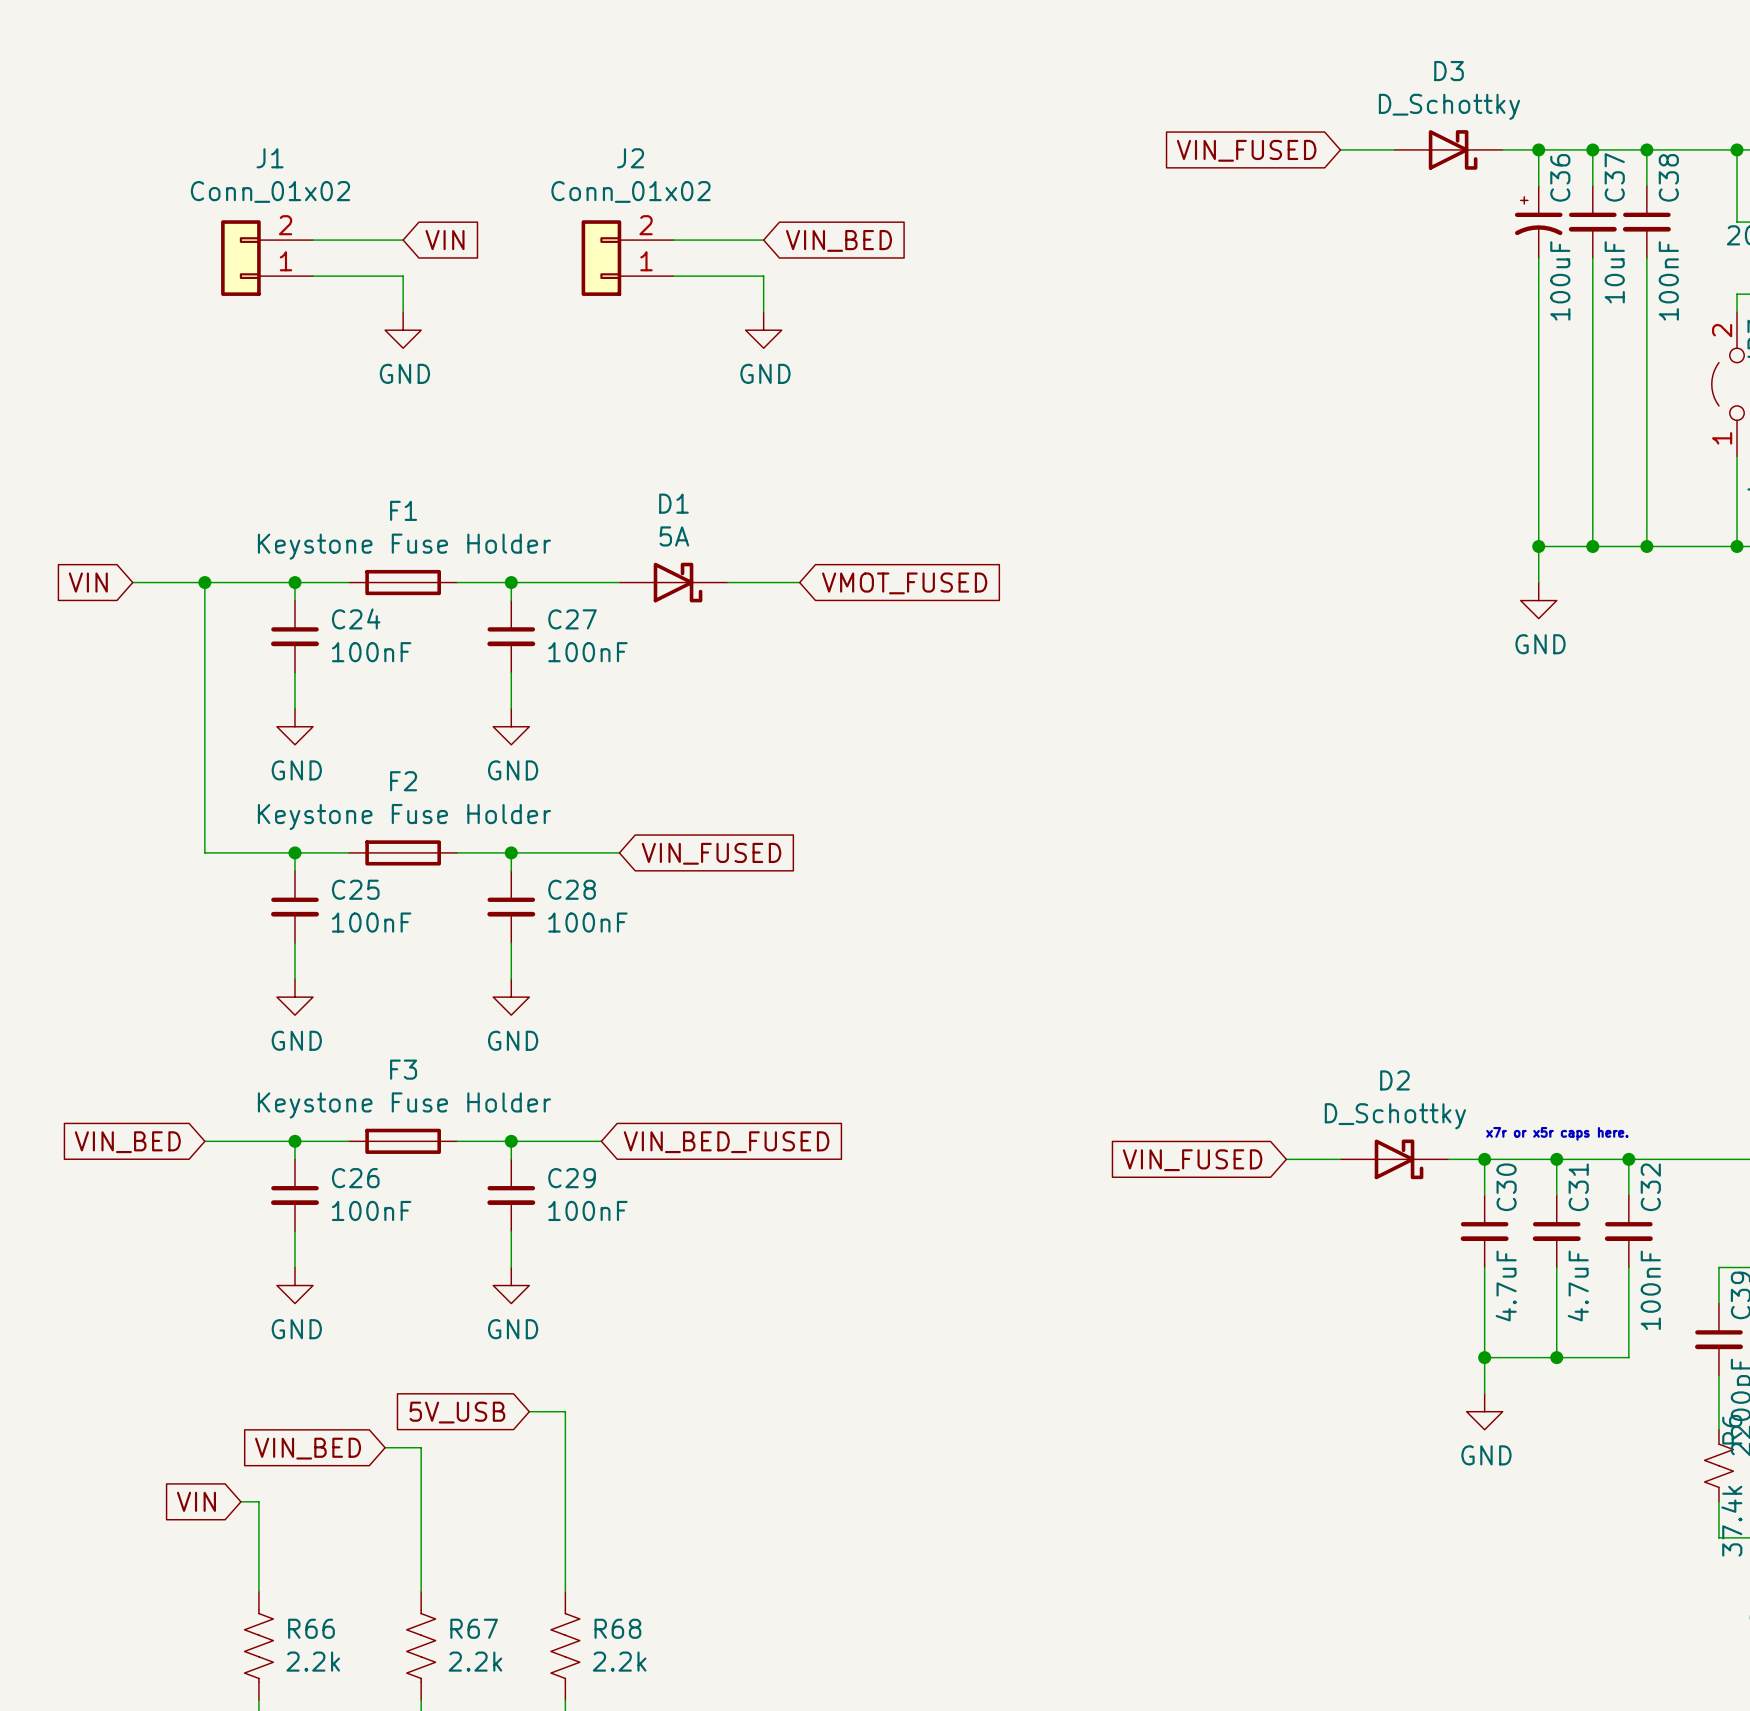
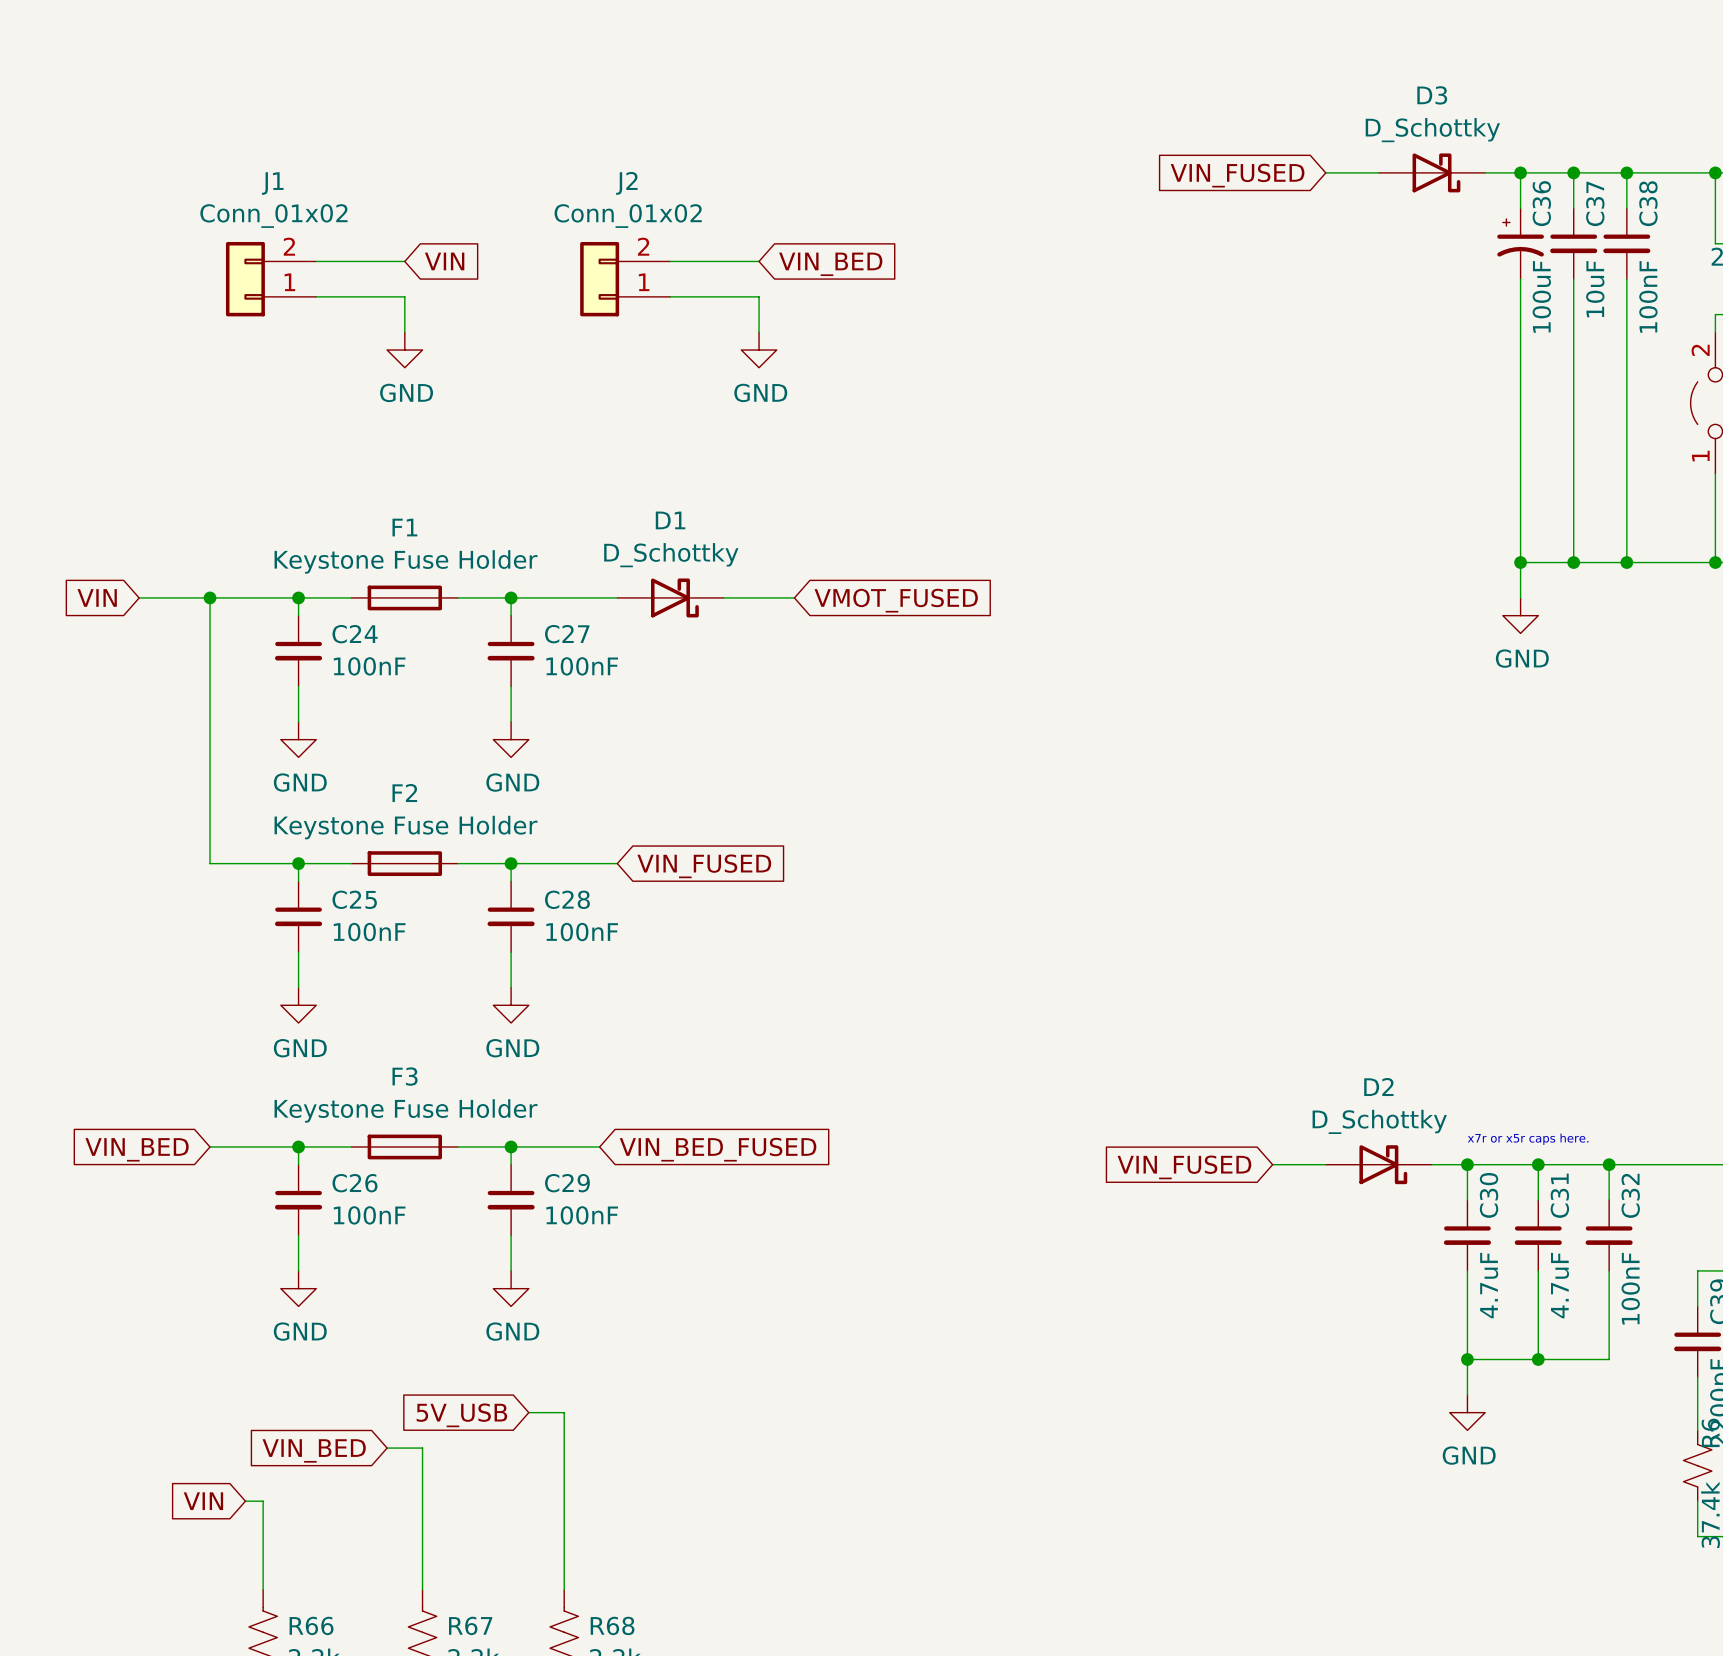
D1 value: 5A (674, 536) -> D_Schottky (671, 555)

